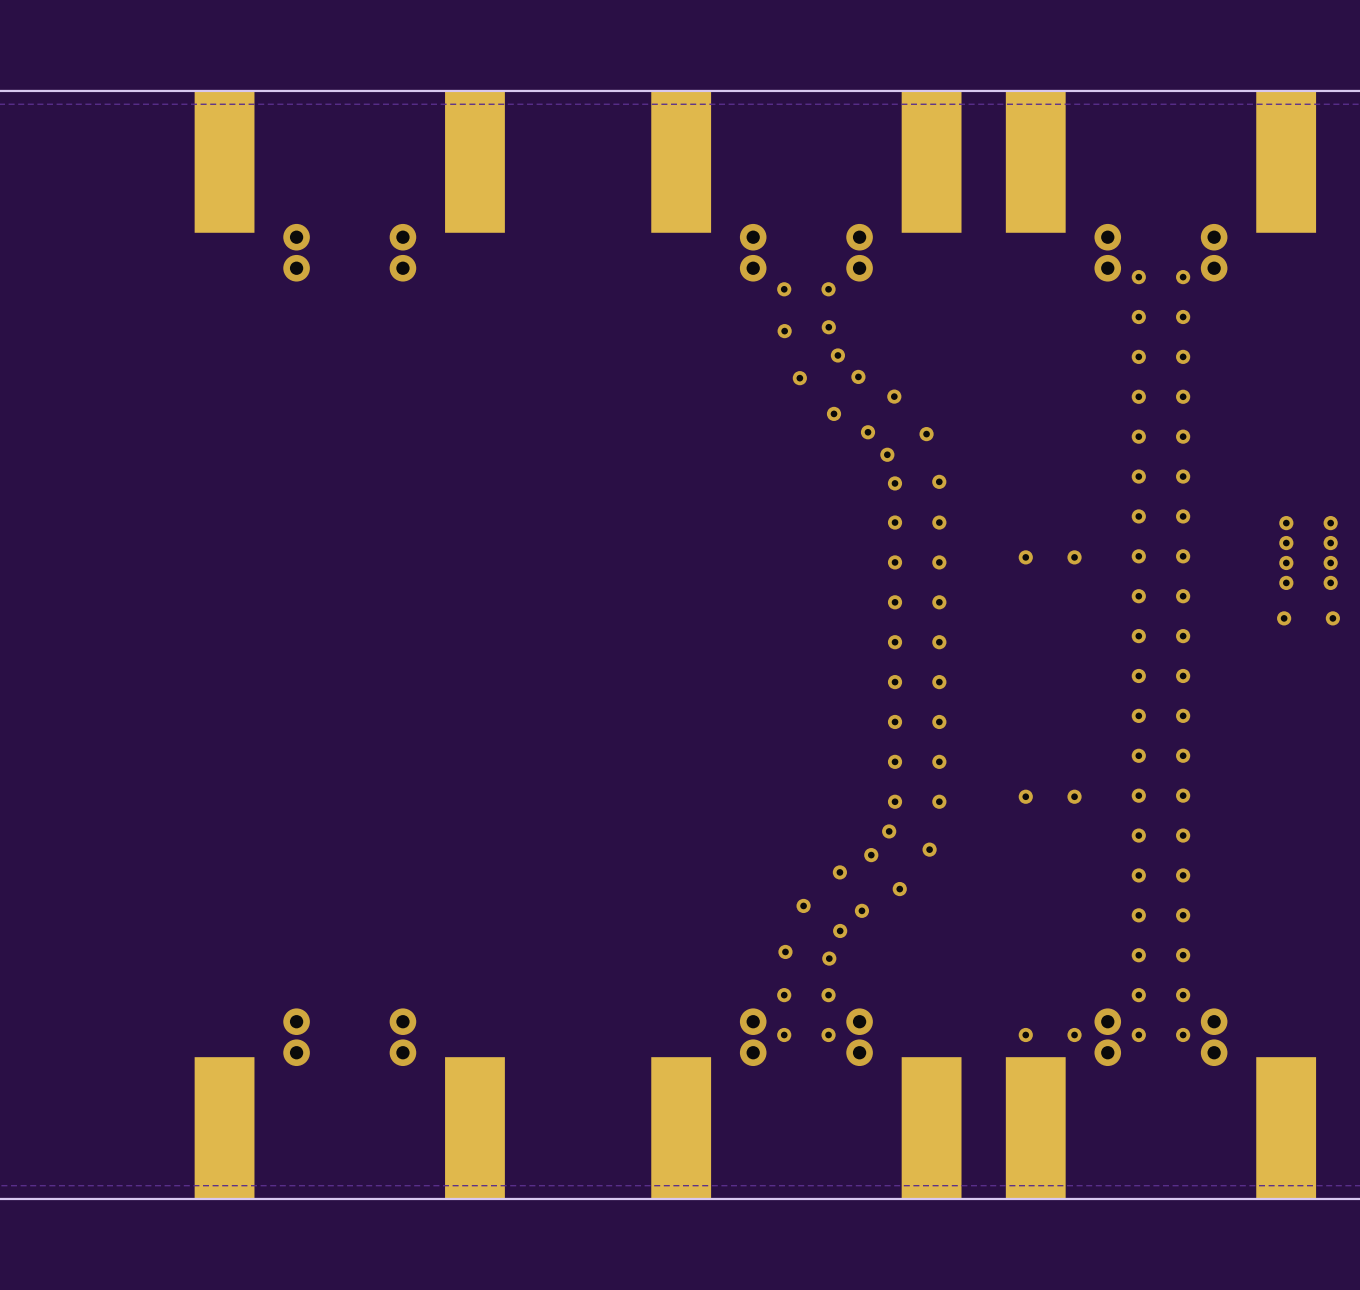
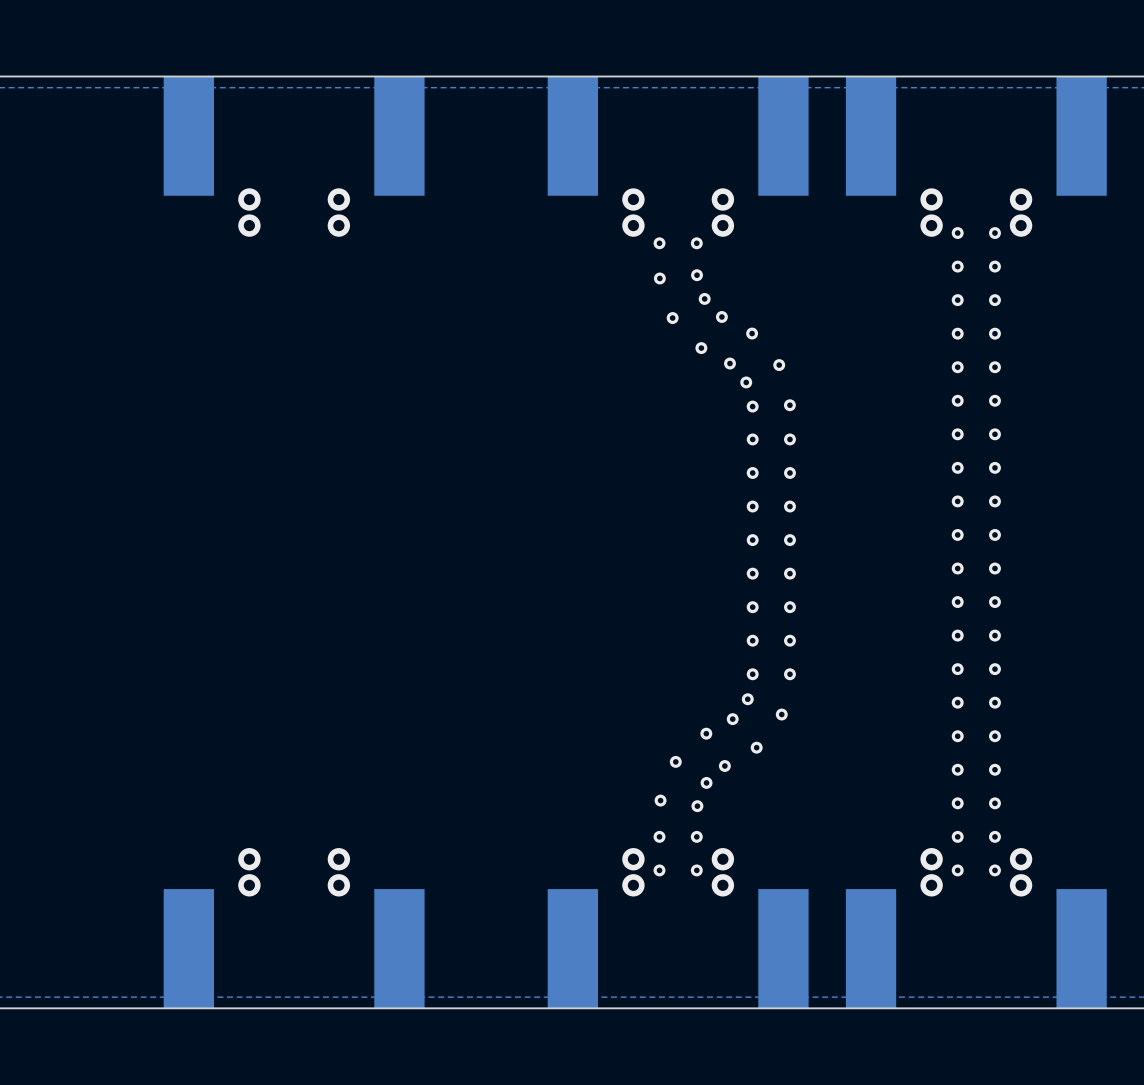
via: (1286, 523) -> none
via: (1330, 523) -> none
via: (1286, 543) -> none
via: (1330, 543) -> none
via: (1025, 557) -> none
via: (1074, 557) -> none
via: (1286, 562) -> none
via: (1330, 562) -> none
via: (1286, 582) -> none
via: (1330, 582) -> none
via: (1284, 618) -> none
via: (1332, 618) -> none
via: (1025, 796) -> none
via: (1074, 796) -> none
via: (1025, 1034) -> none
via: (1074, 1034) -> none

